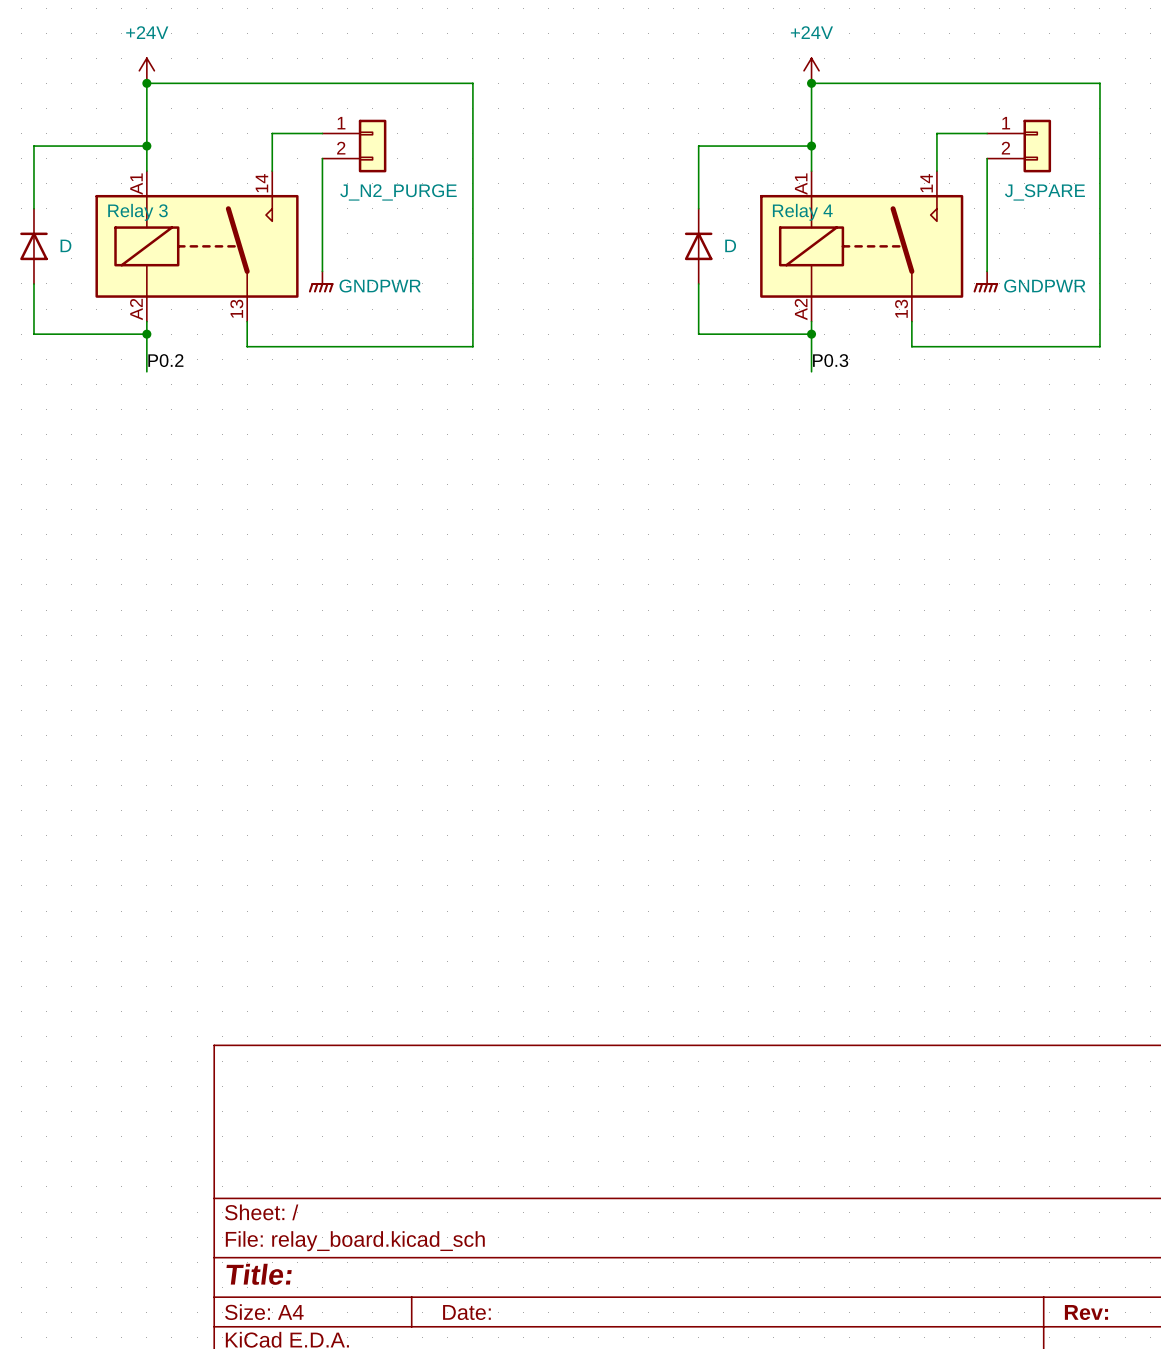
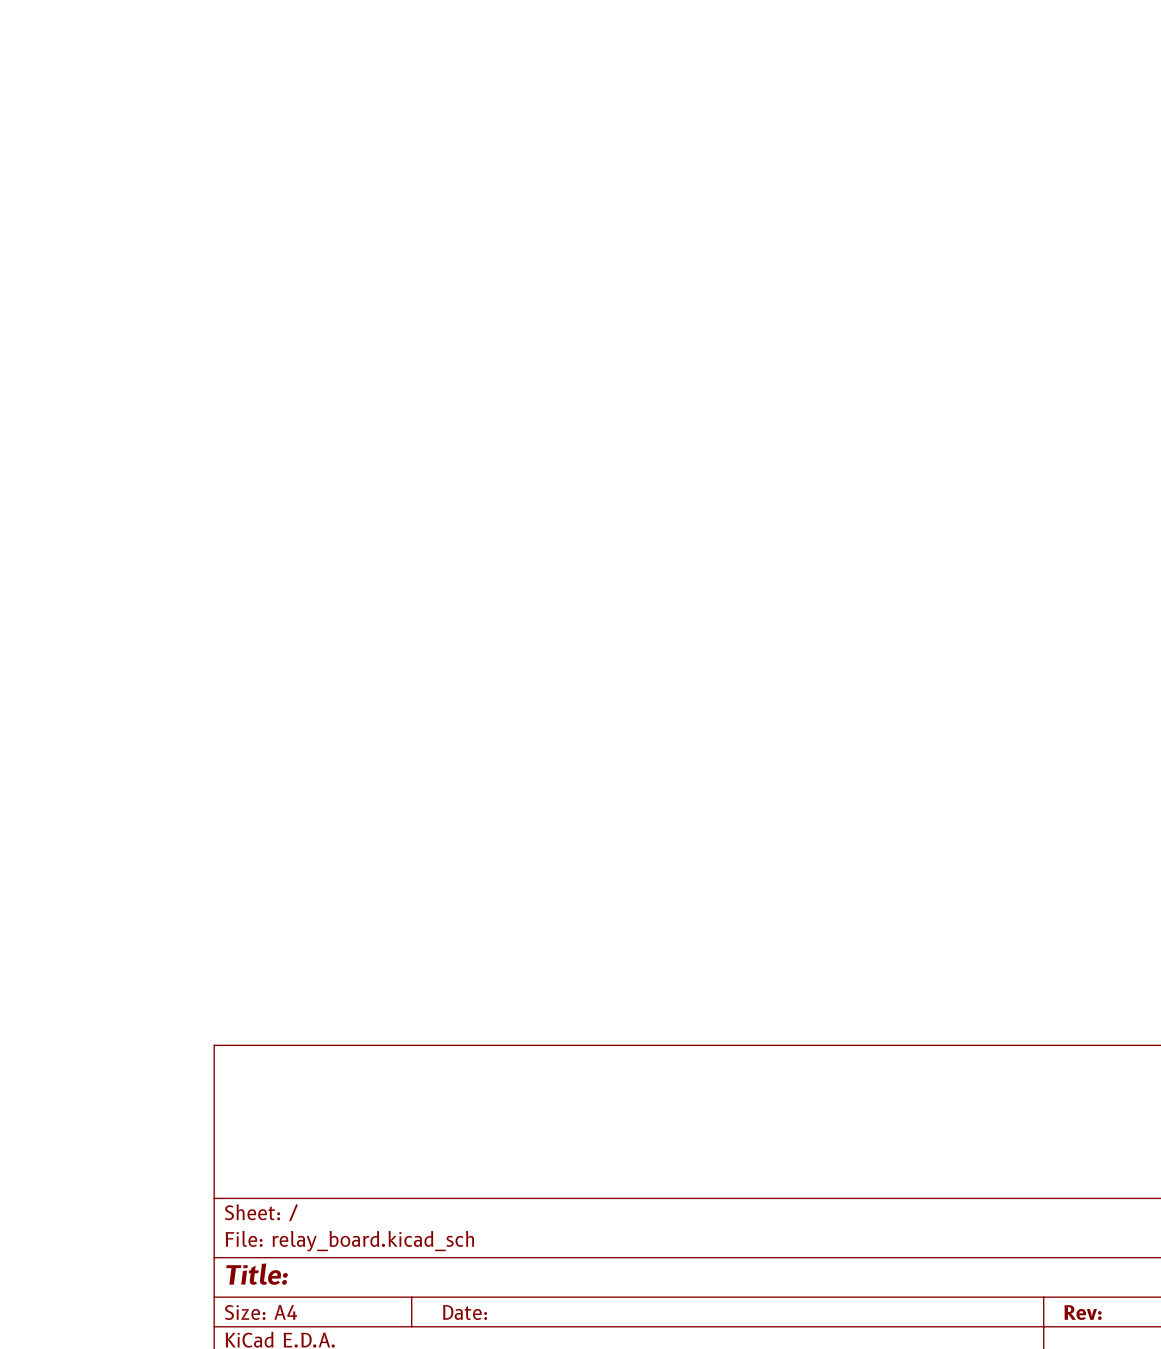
power symbol: +24V (146, 70) -> none
power symbol: +24V (811, 70) -> none
junction: (146, 83) -> none
junction: (811, 83) -> none
wire: (322, 133) (272, 133) (272, 171) -> none
wire: (987, 133) (936, 133) (936, 171) -> none
wire: (146, 146) (33, 146) (33, 208) -> none
junction: (146, 146) -> none
part: J_N2_PURGE (354, 146) -> none
wire: (811, 146) (698, 146) (698, 208) -> none
junction: (811, 146) -> none
part: J_SPARE (1019, 146) -> none
wire: (322, 158) (322, 271) -> none
wire: (987, 158) (987, 271) -> none
wire: (146, 171) (146, 83) (472, 83) (472, 346) (247, 346) (247, 321) -> none
wire: (811, 171) (811, 83) (1099, 83) (1099, 346) (911, 346) (911, 321) -> none
part: D (33, 246) -> none
part: Relay 3 (197, 246) -> none
part: D (698, 246) -> none
part: Relay 4 (861, 246) -> none
power symbol: GNDPWR (321, 281) -> none
power symbol: GNDPWR (985, 281) -> none
wire: (33, 283) (33, 334) (146, 334) -> none
wire: (698, 283) (698, 334) (811, 334) -> none
wire: (146, 321) (146, 371) -> none
wire: (811, 321) (811, 371) -> none
junction: (146, 334) -> none
junction: (811, 334) -> none
label: P0.2 (165, 360) -> none
label: P0.3 (830, 360) -> none

